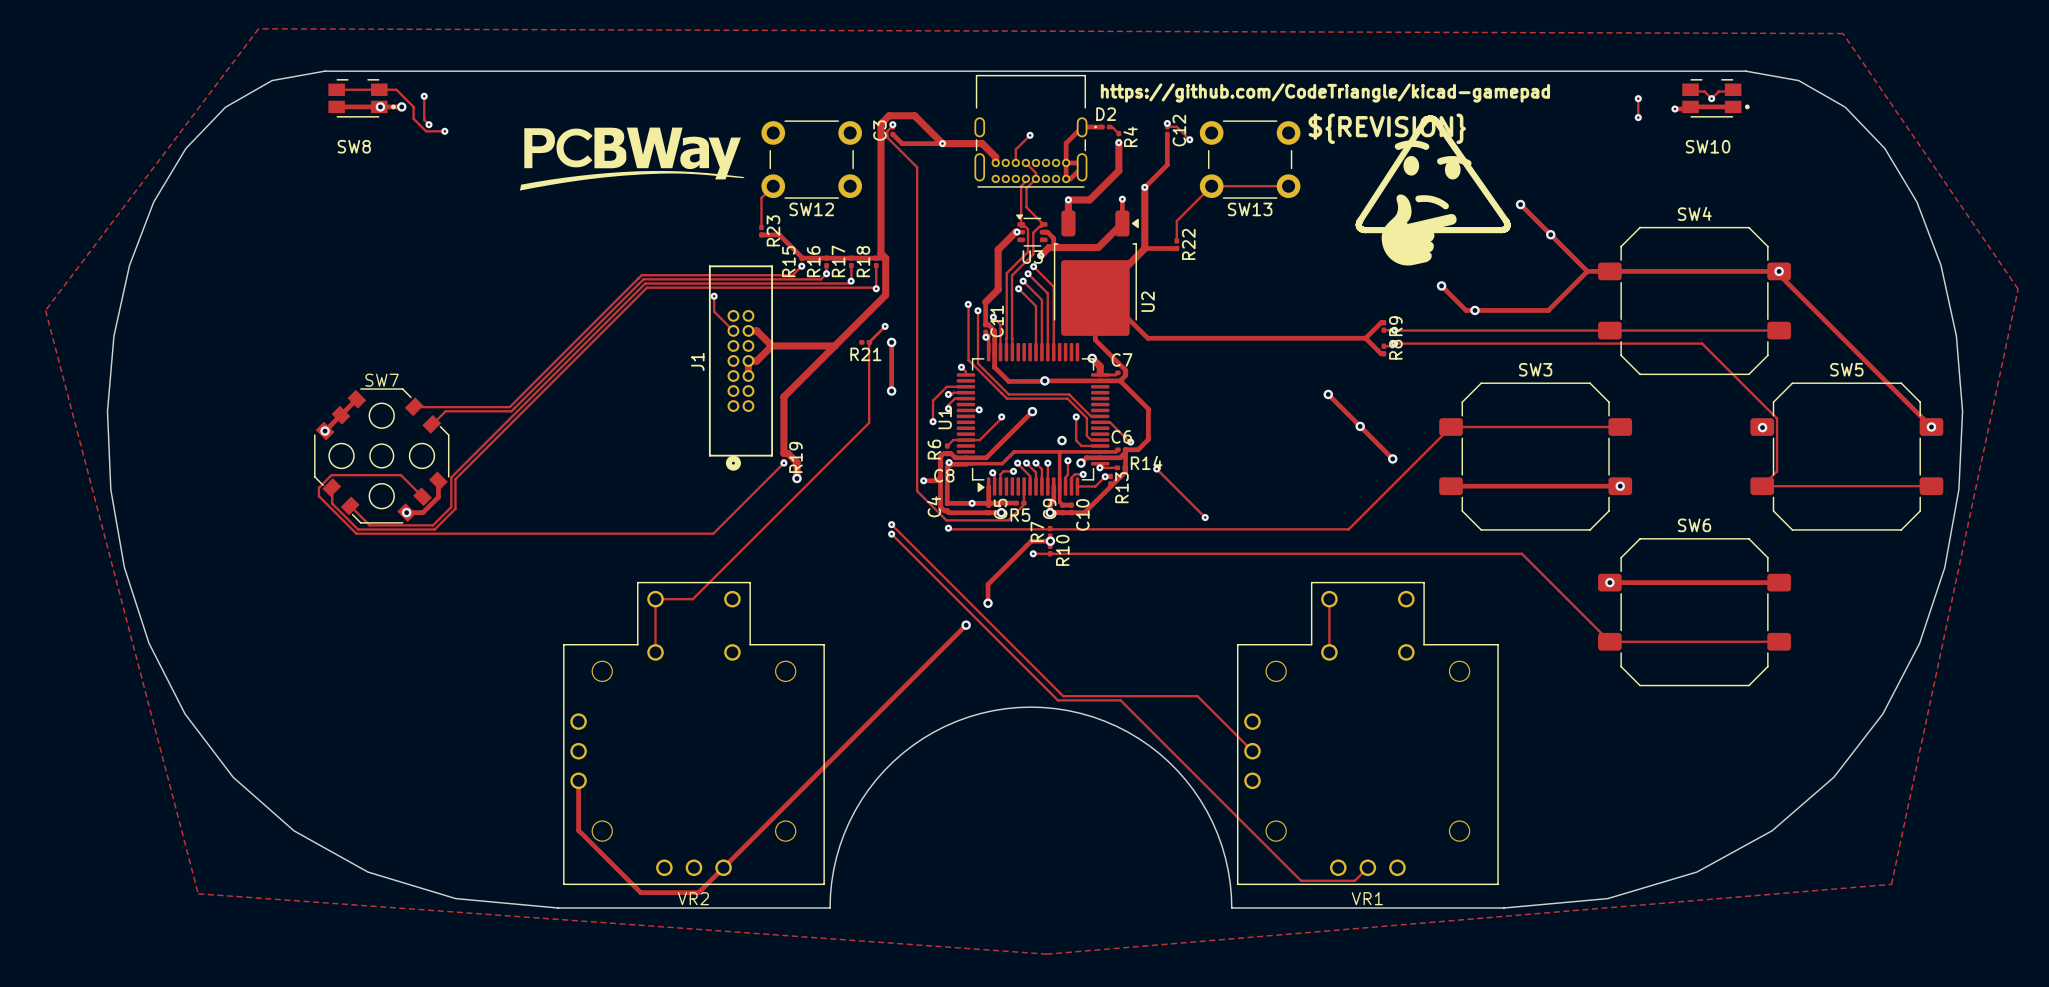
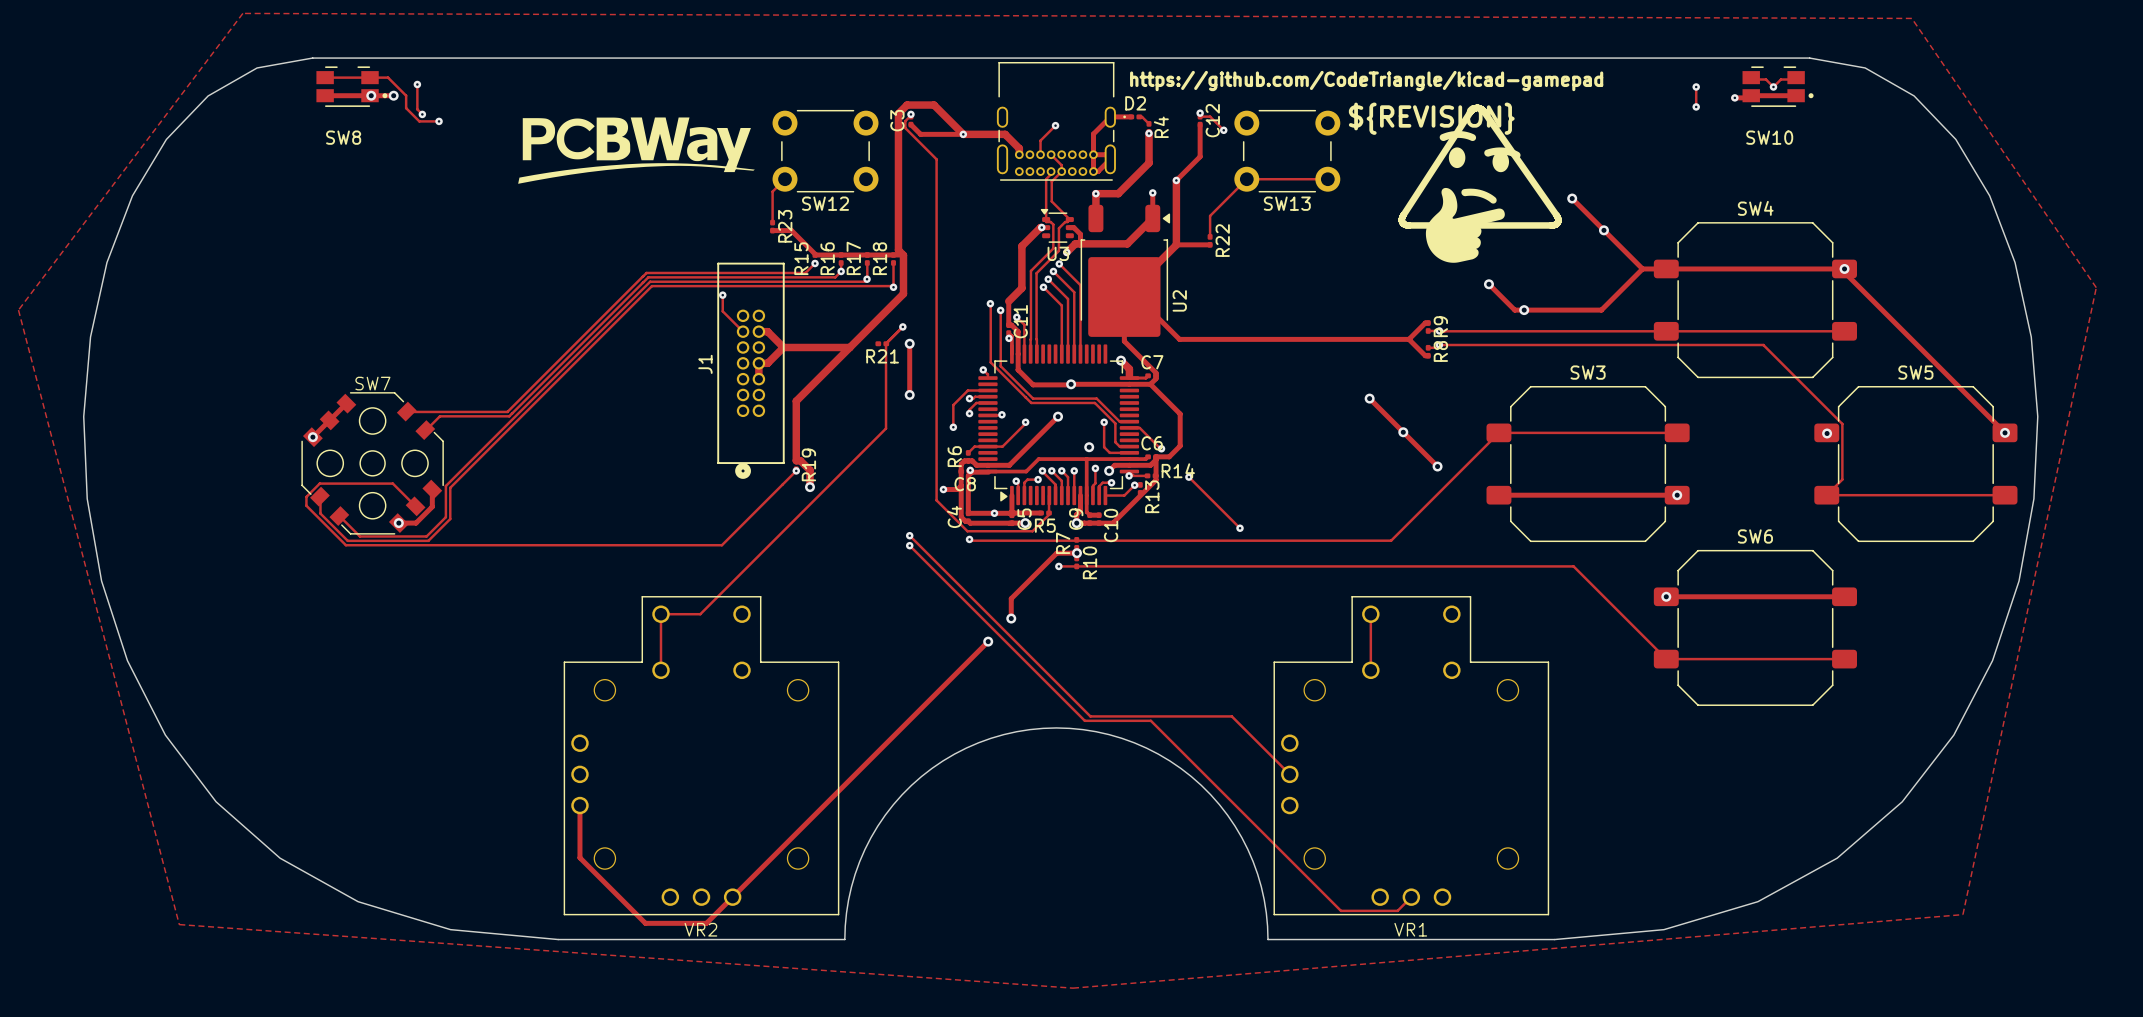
U1 name: U1 (945, 419) -> none

